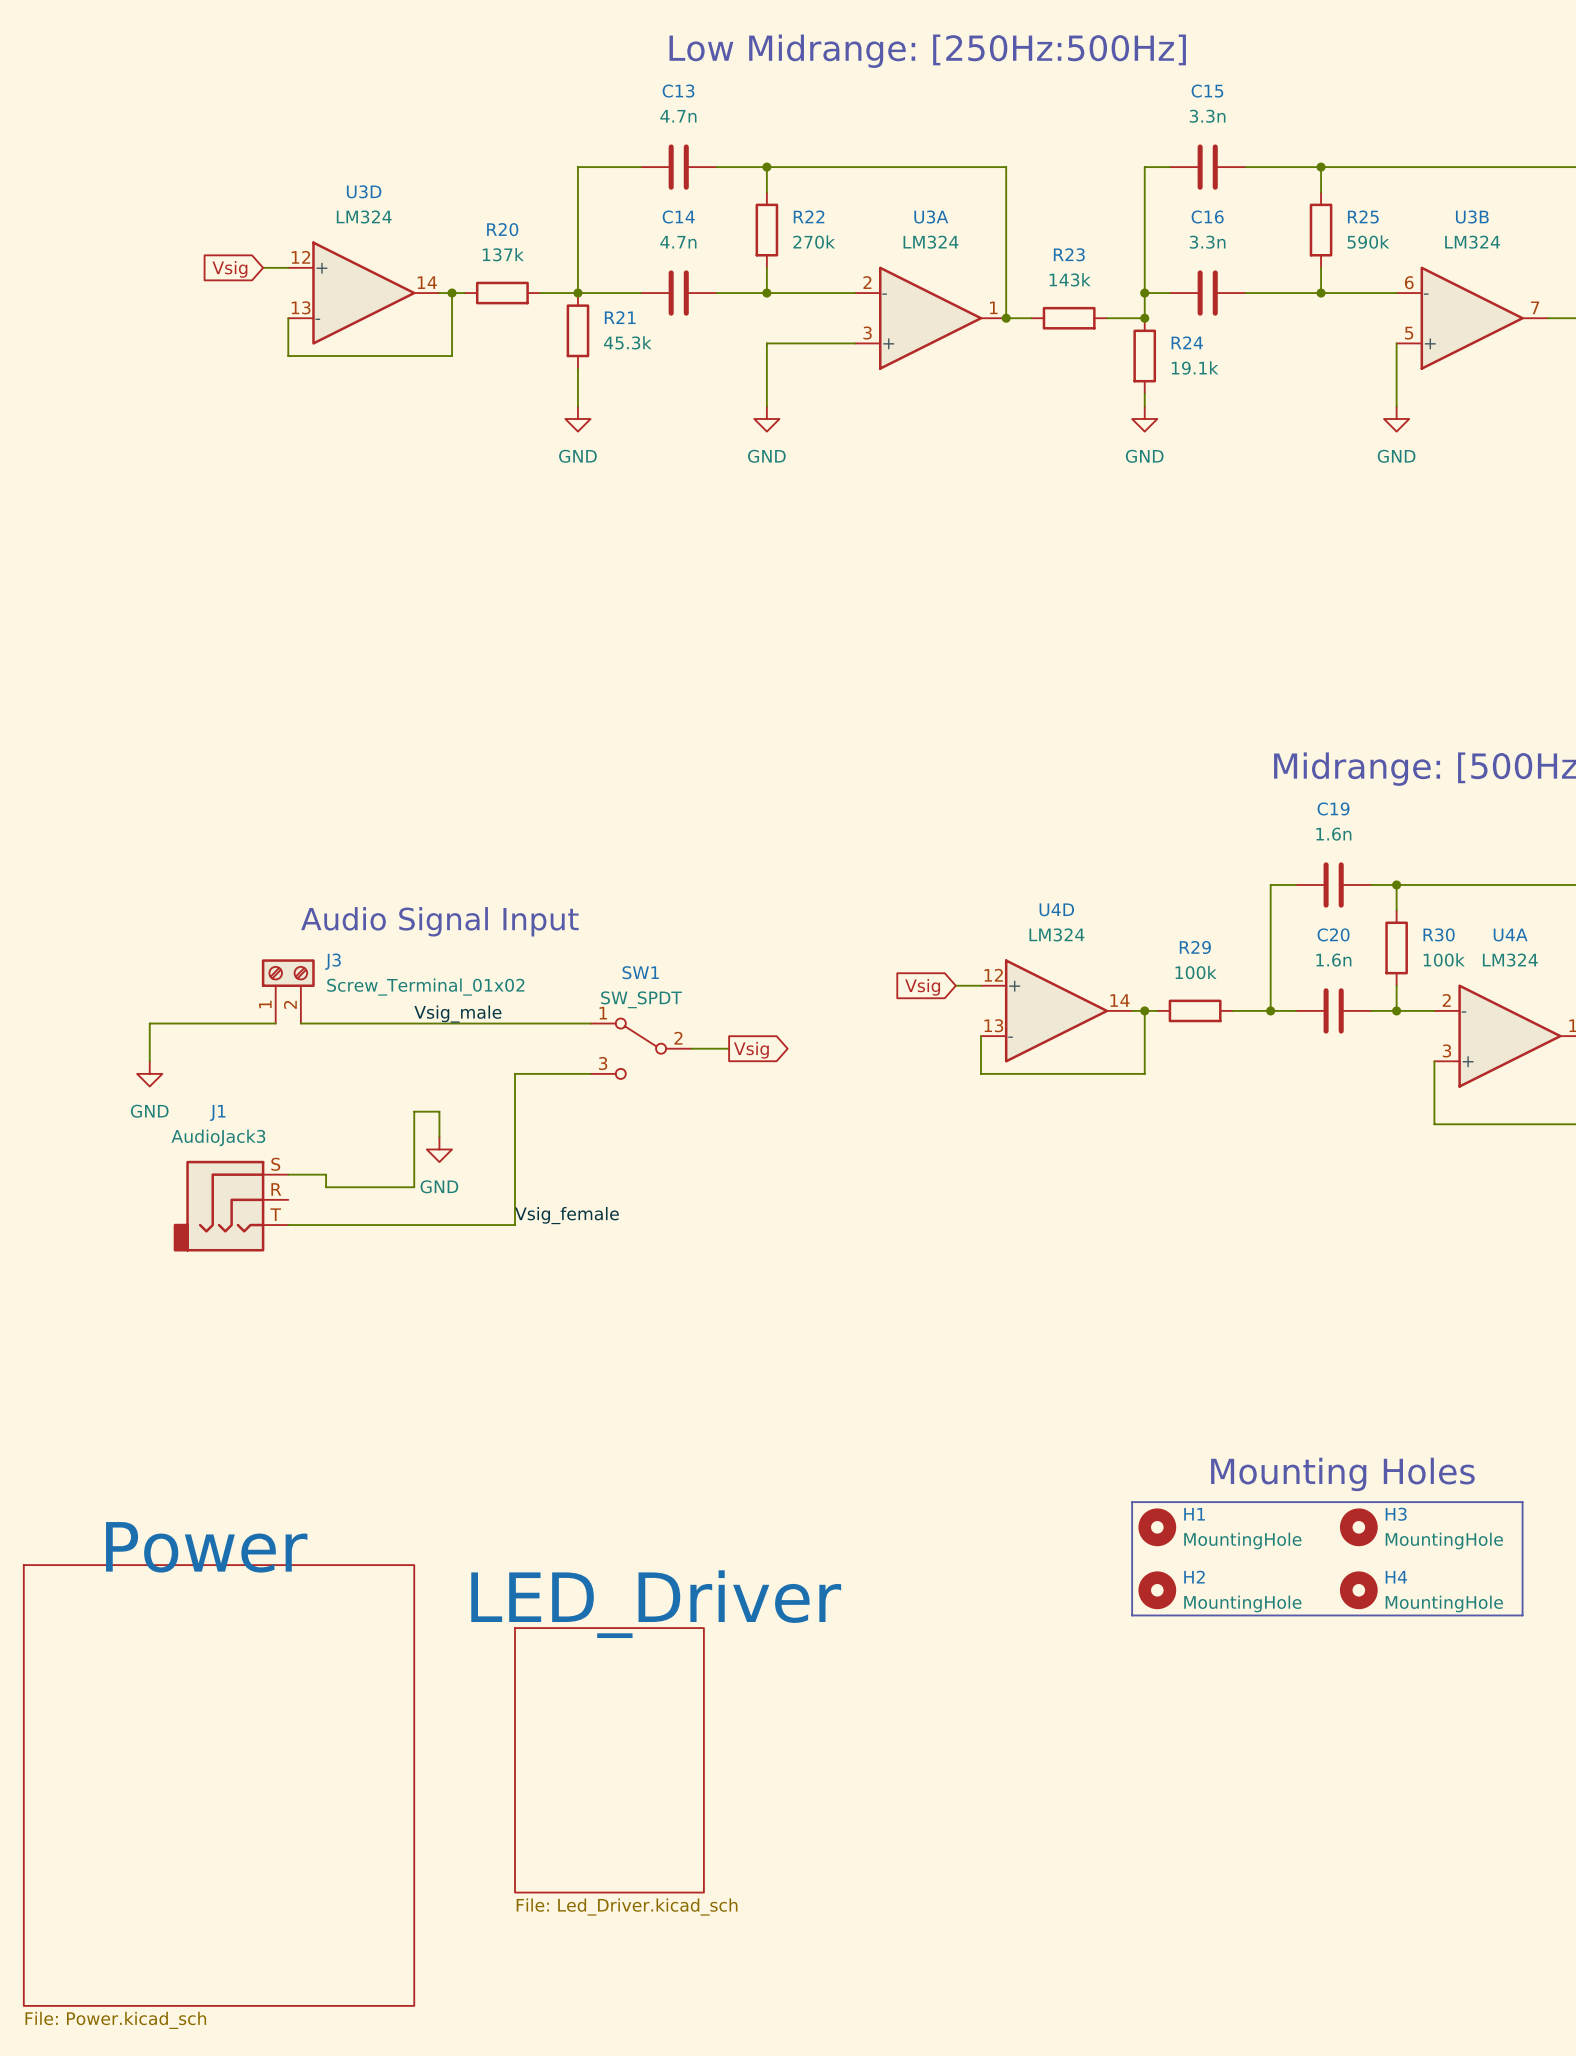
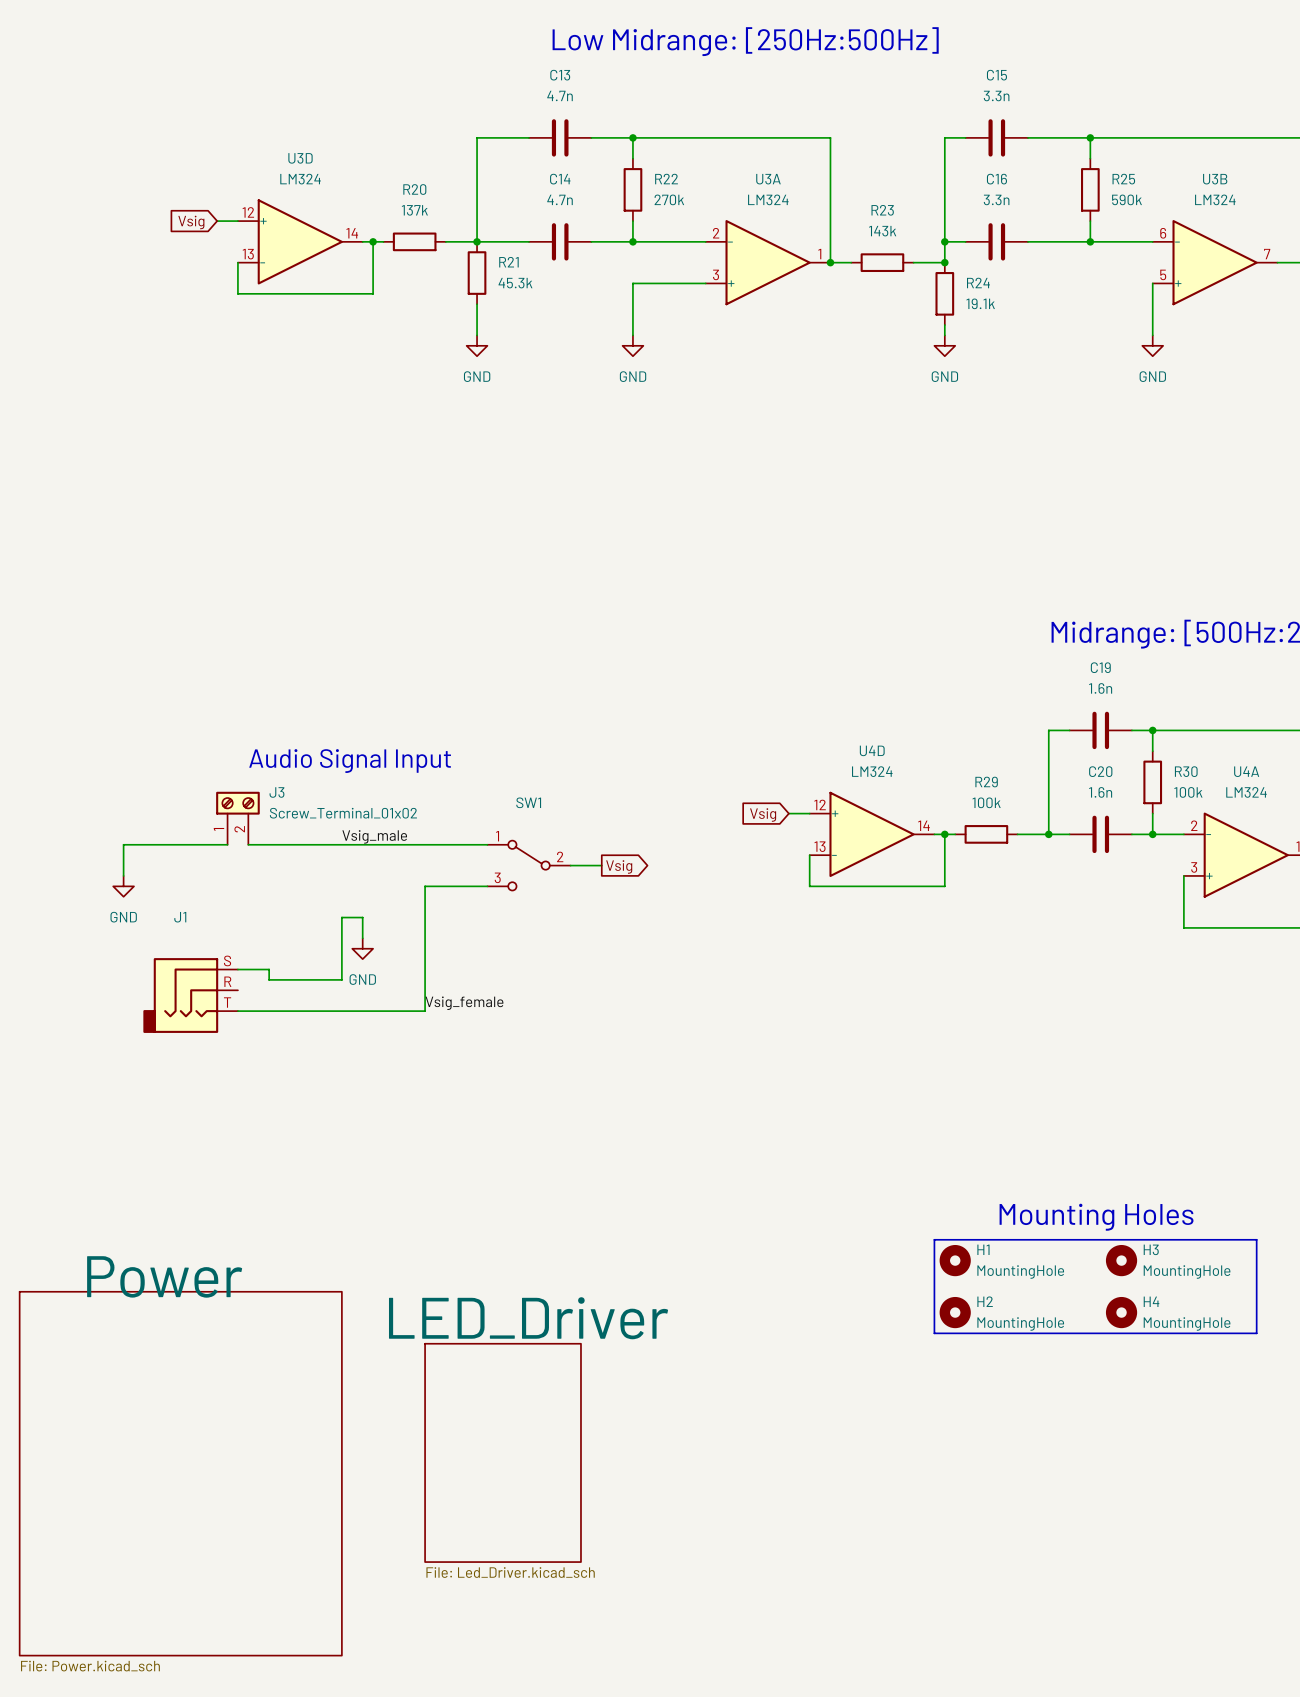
SW1 value: SW_SPDT (641, 999) -> none
J1 value: AudioJack3 (218, 1137) -> none

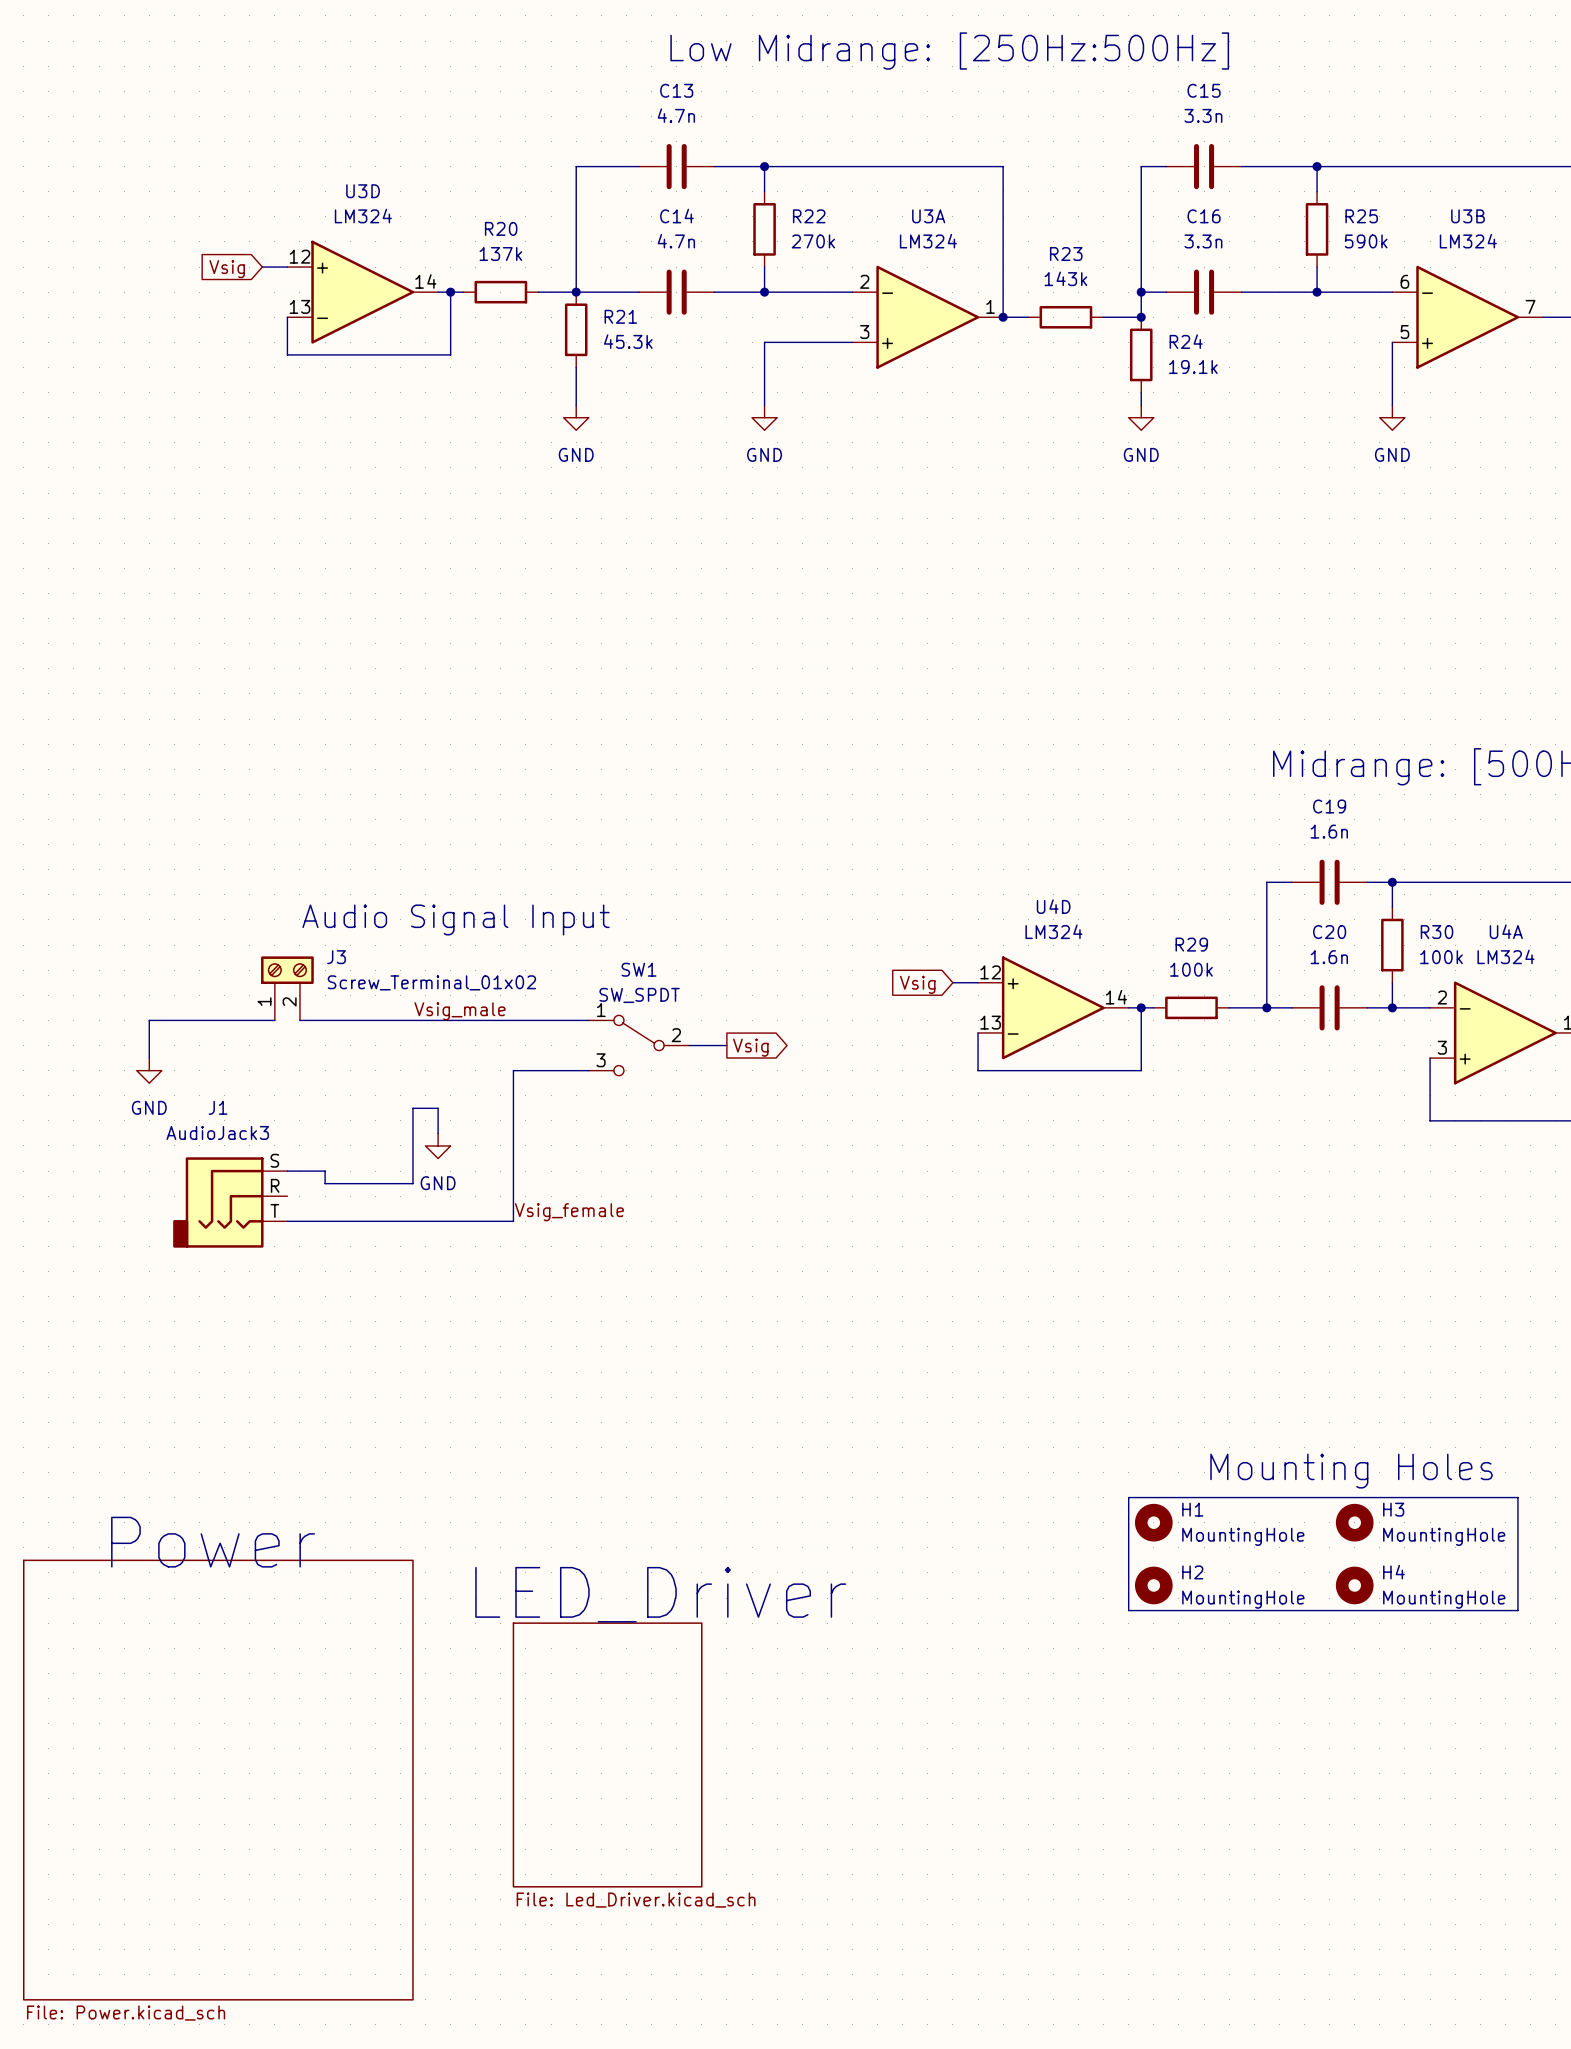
SW1 value: none -> SW_SPDT (639, 995)
J1 value: none -> AudioJack3 (217, 1132)

